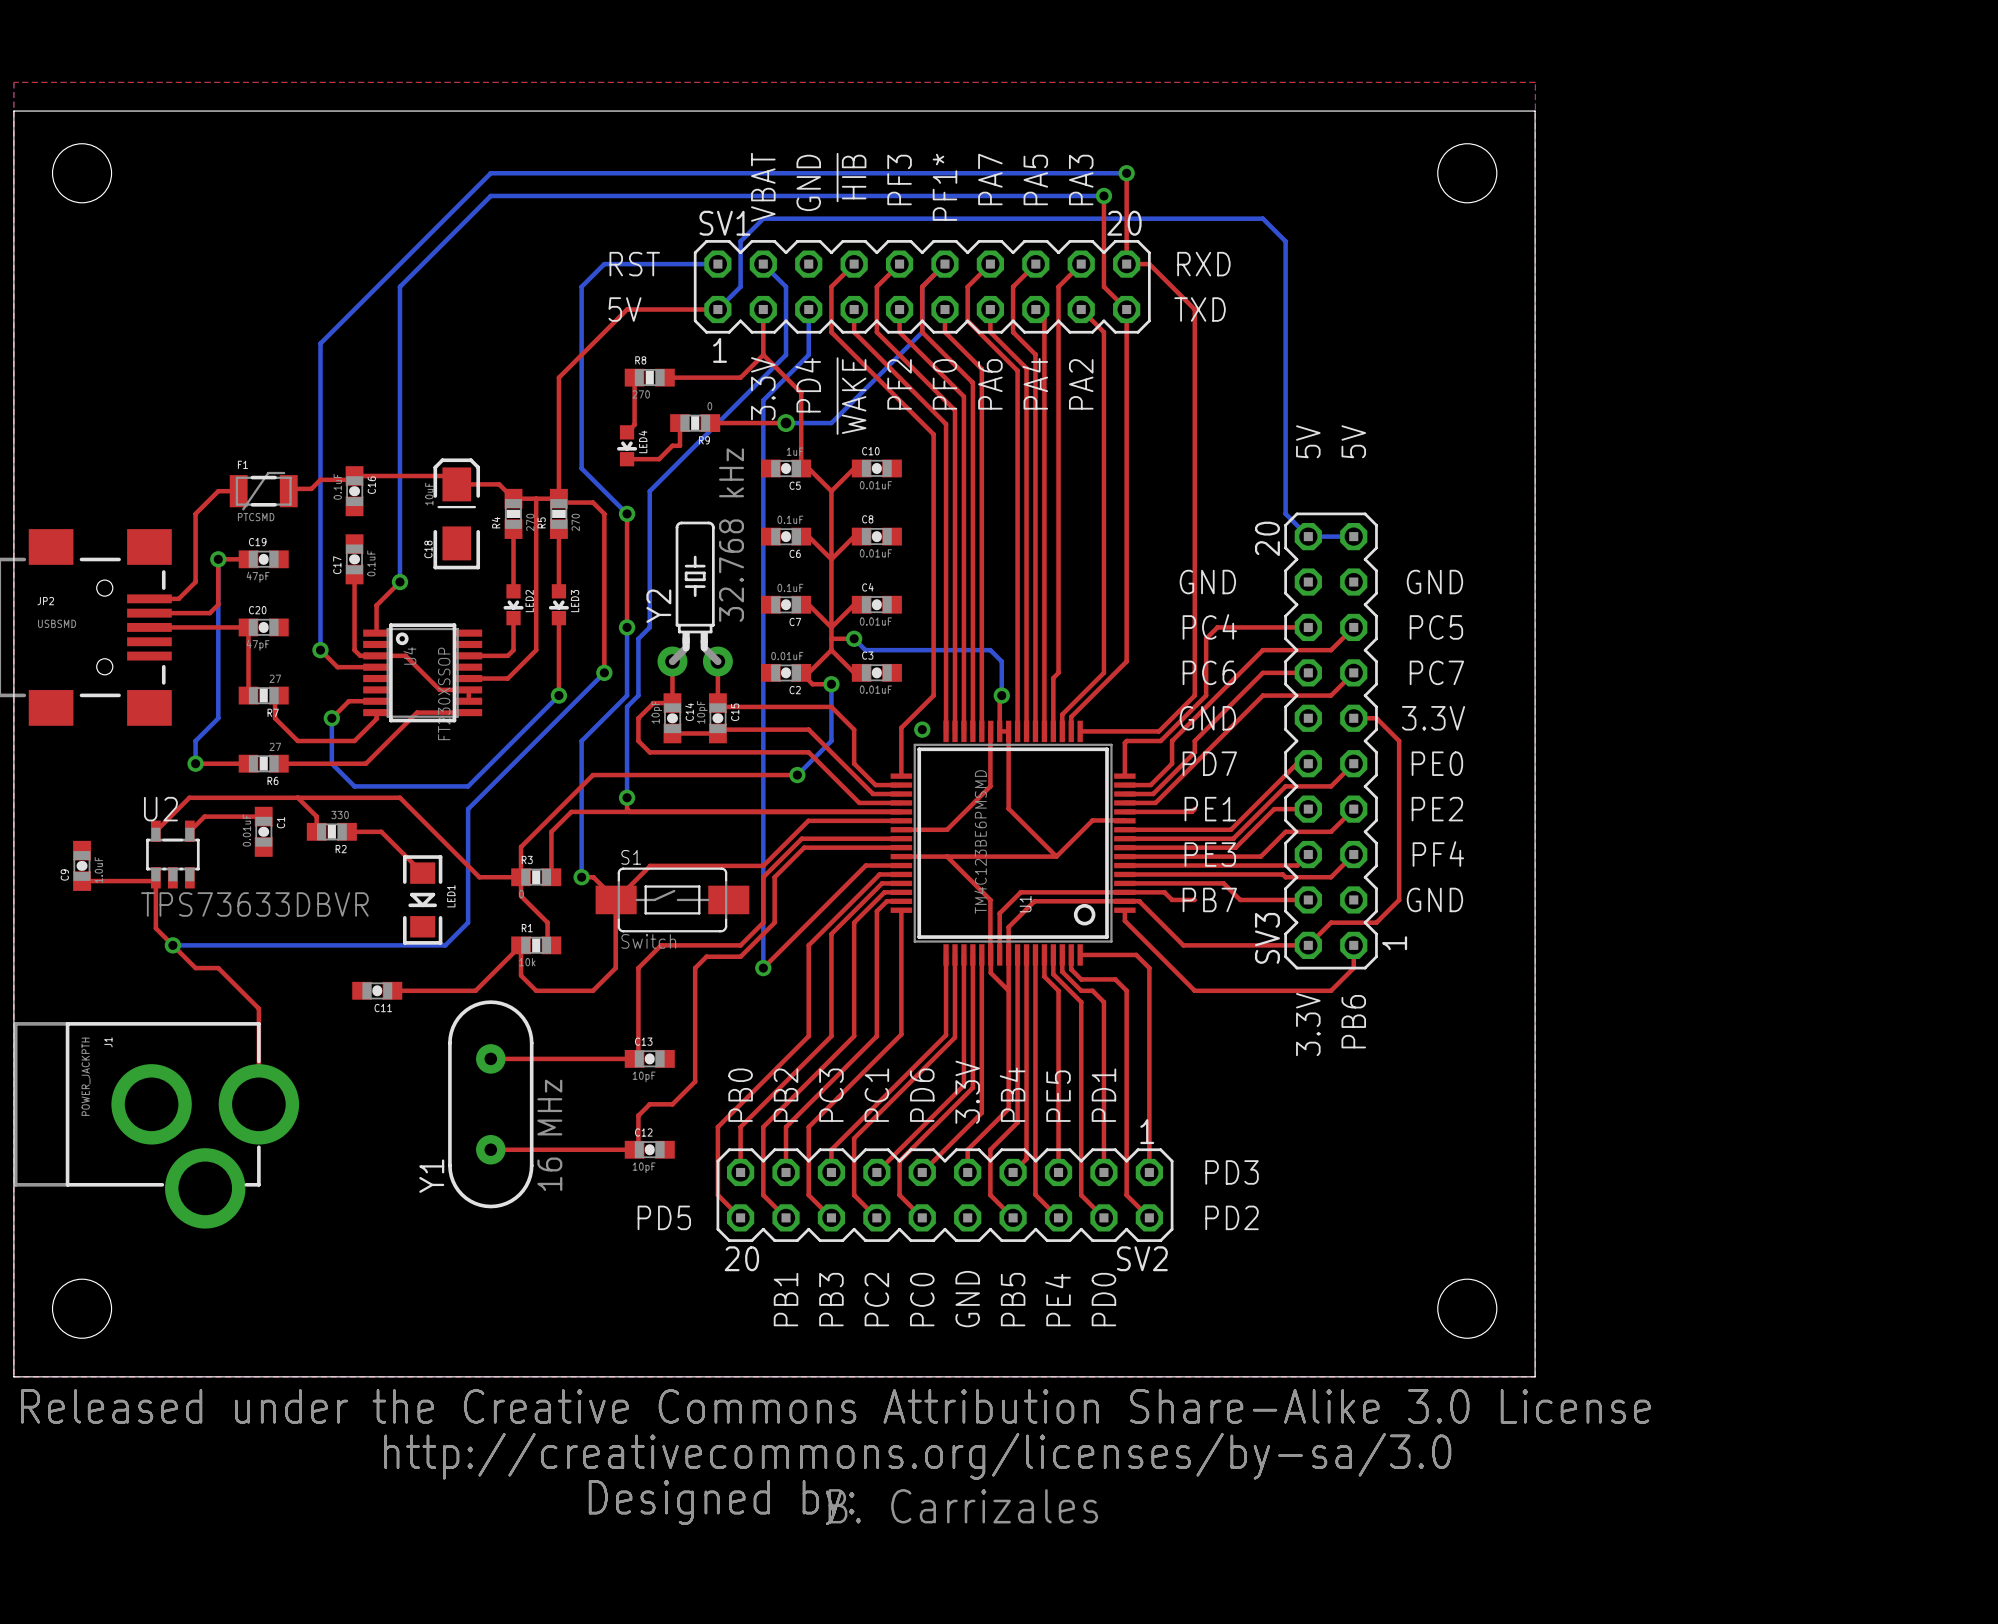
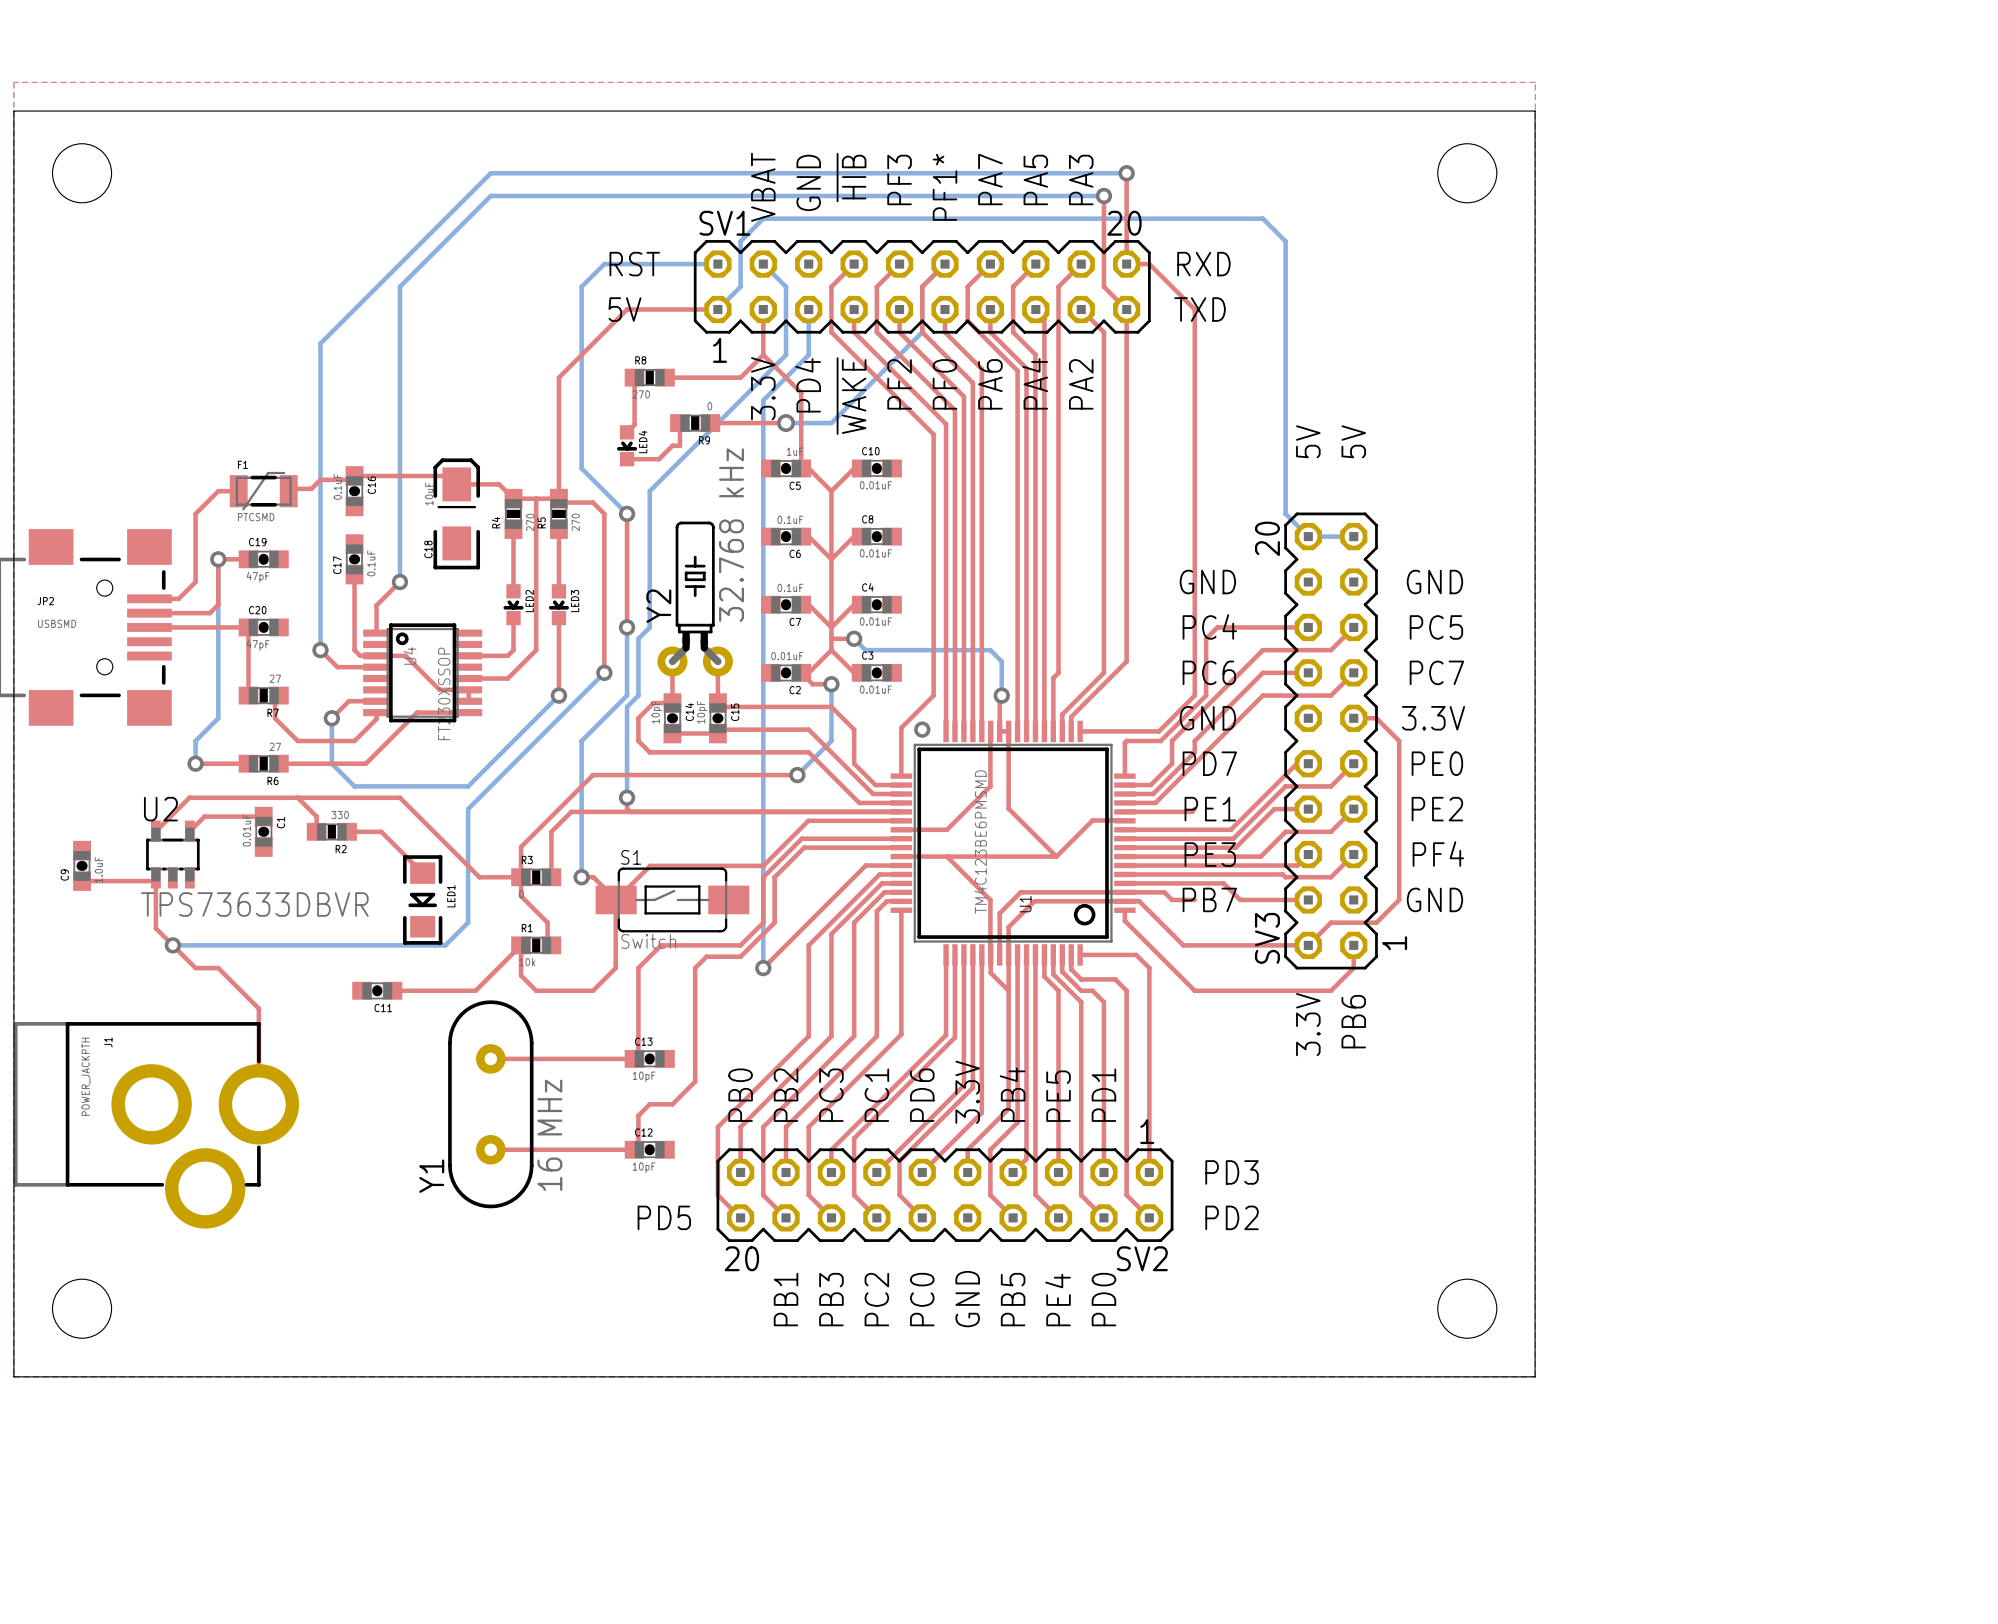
drawing: [21, 1389, 1651, 1525] -> none
text: B. Carrizales (963, 1506) -> none

